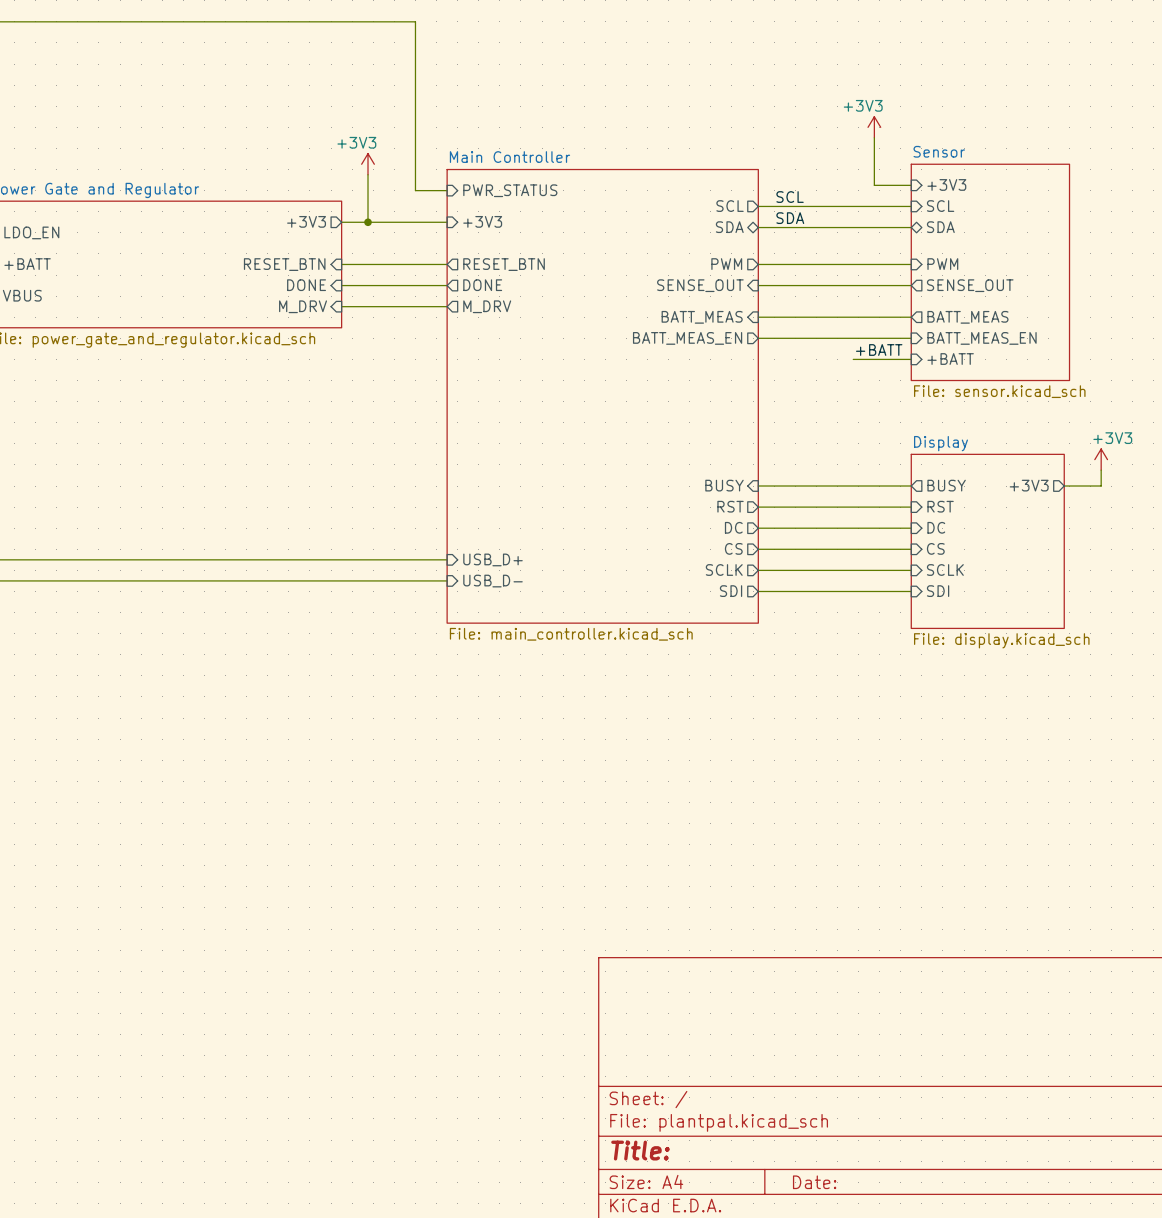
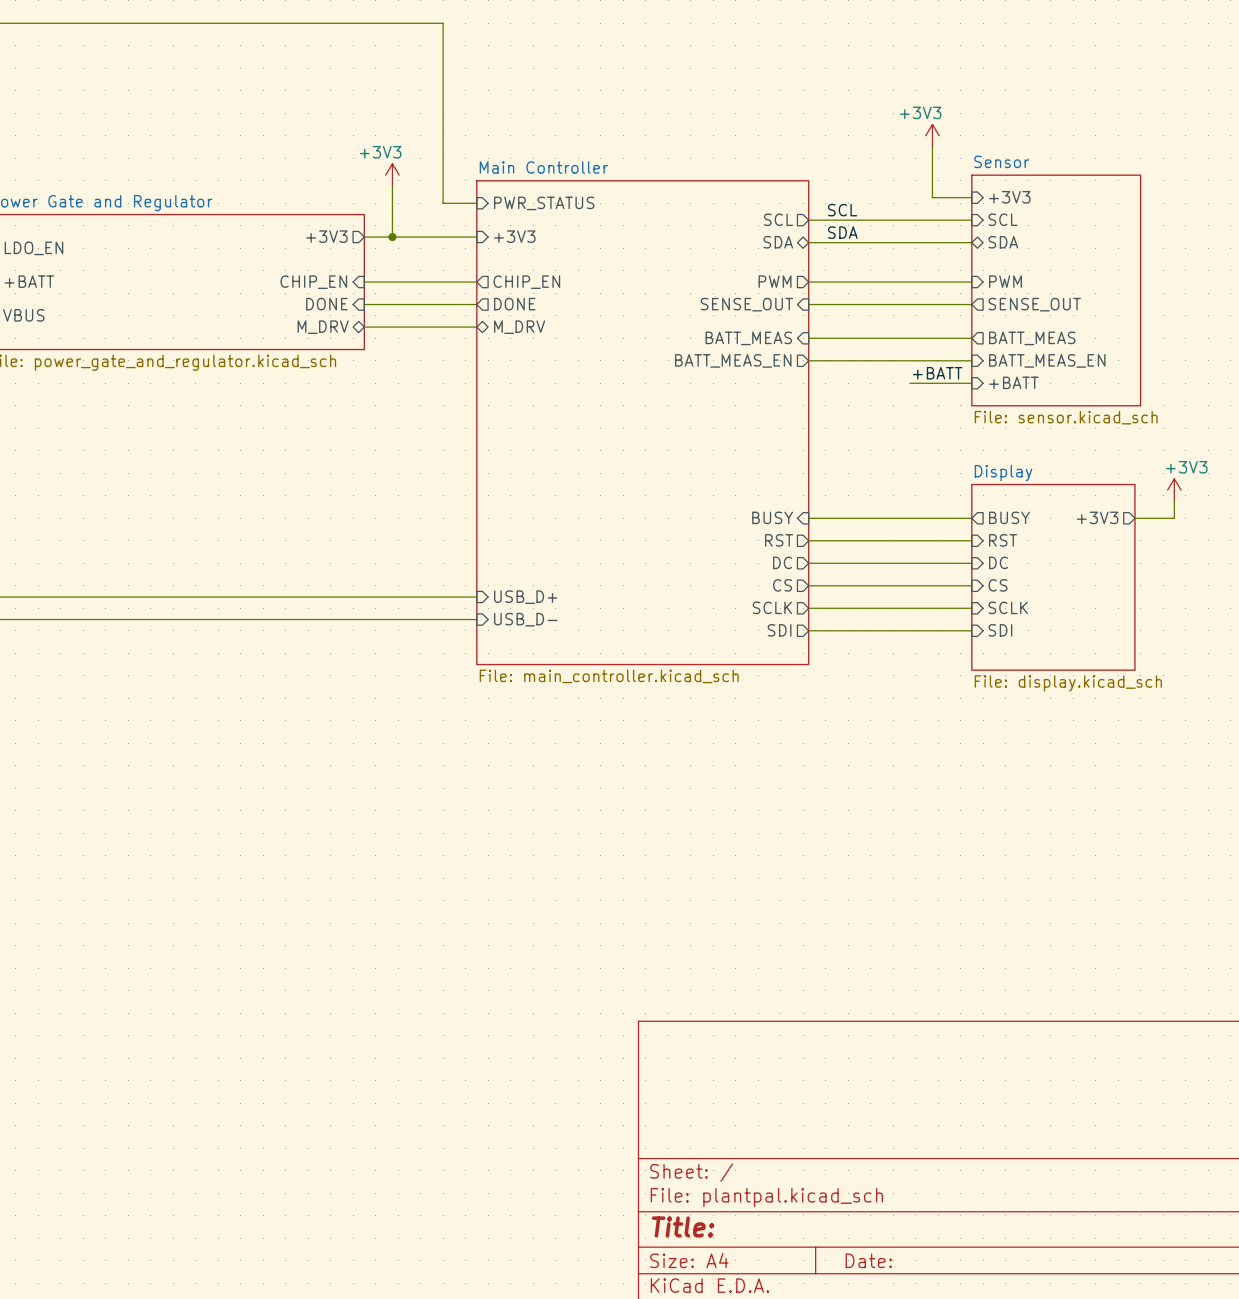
sheet pin: RESET_BTN (284, 264) -> CHIP_EN (313, 282)
sheet pin: RESET_BTN (504, 264) -> CHIP_EN (526, 282)
sheet pin shape: input (303, 306) -> bidirectional (323, 327)
sheet pin shape: output (487, 306) -> bidirectional (519, 327)

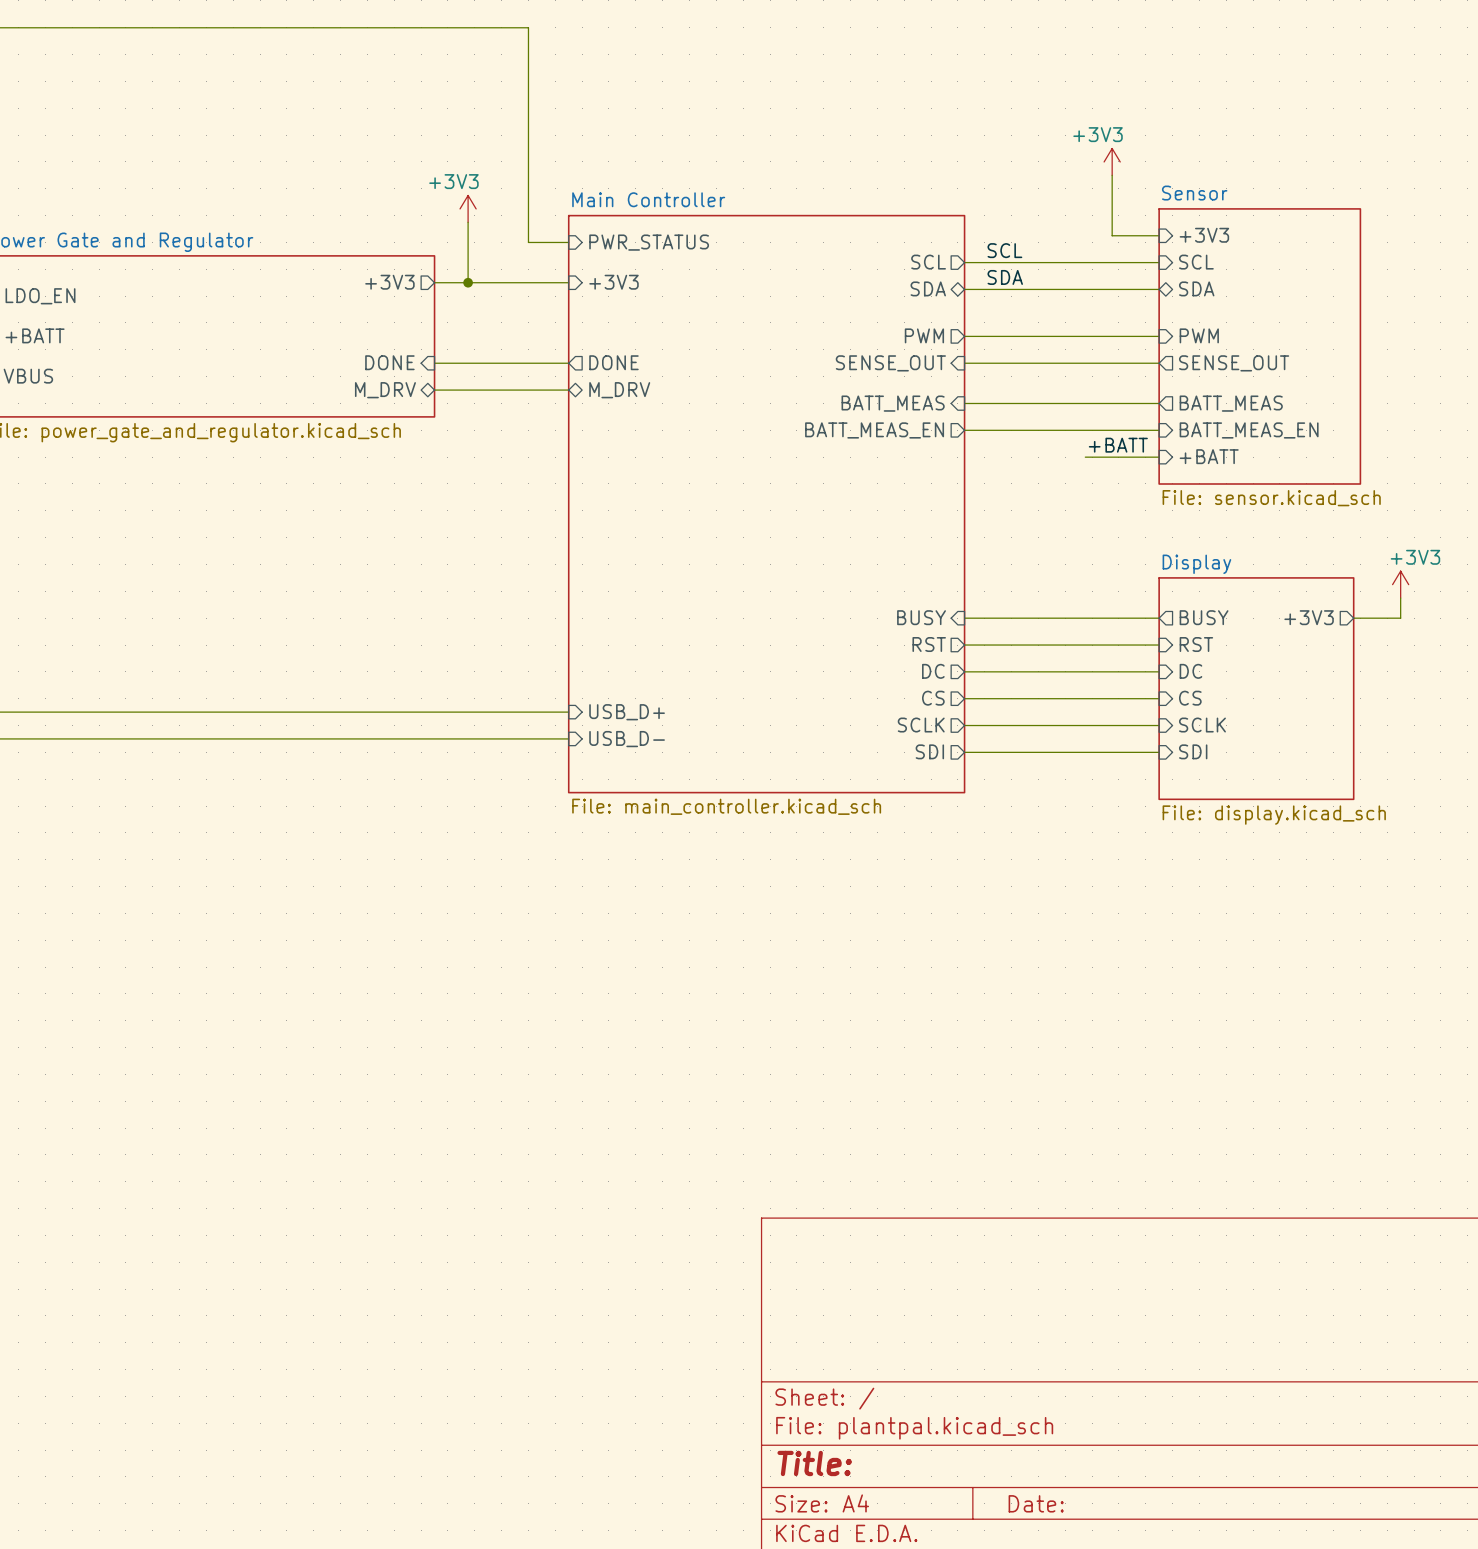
sheet pin: CHIP_EN (313, 282) -> none
wire: (364, 282) (476, 282) -> none
sheet pin: CHIP_EN (526, 282) -> none

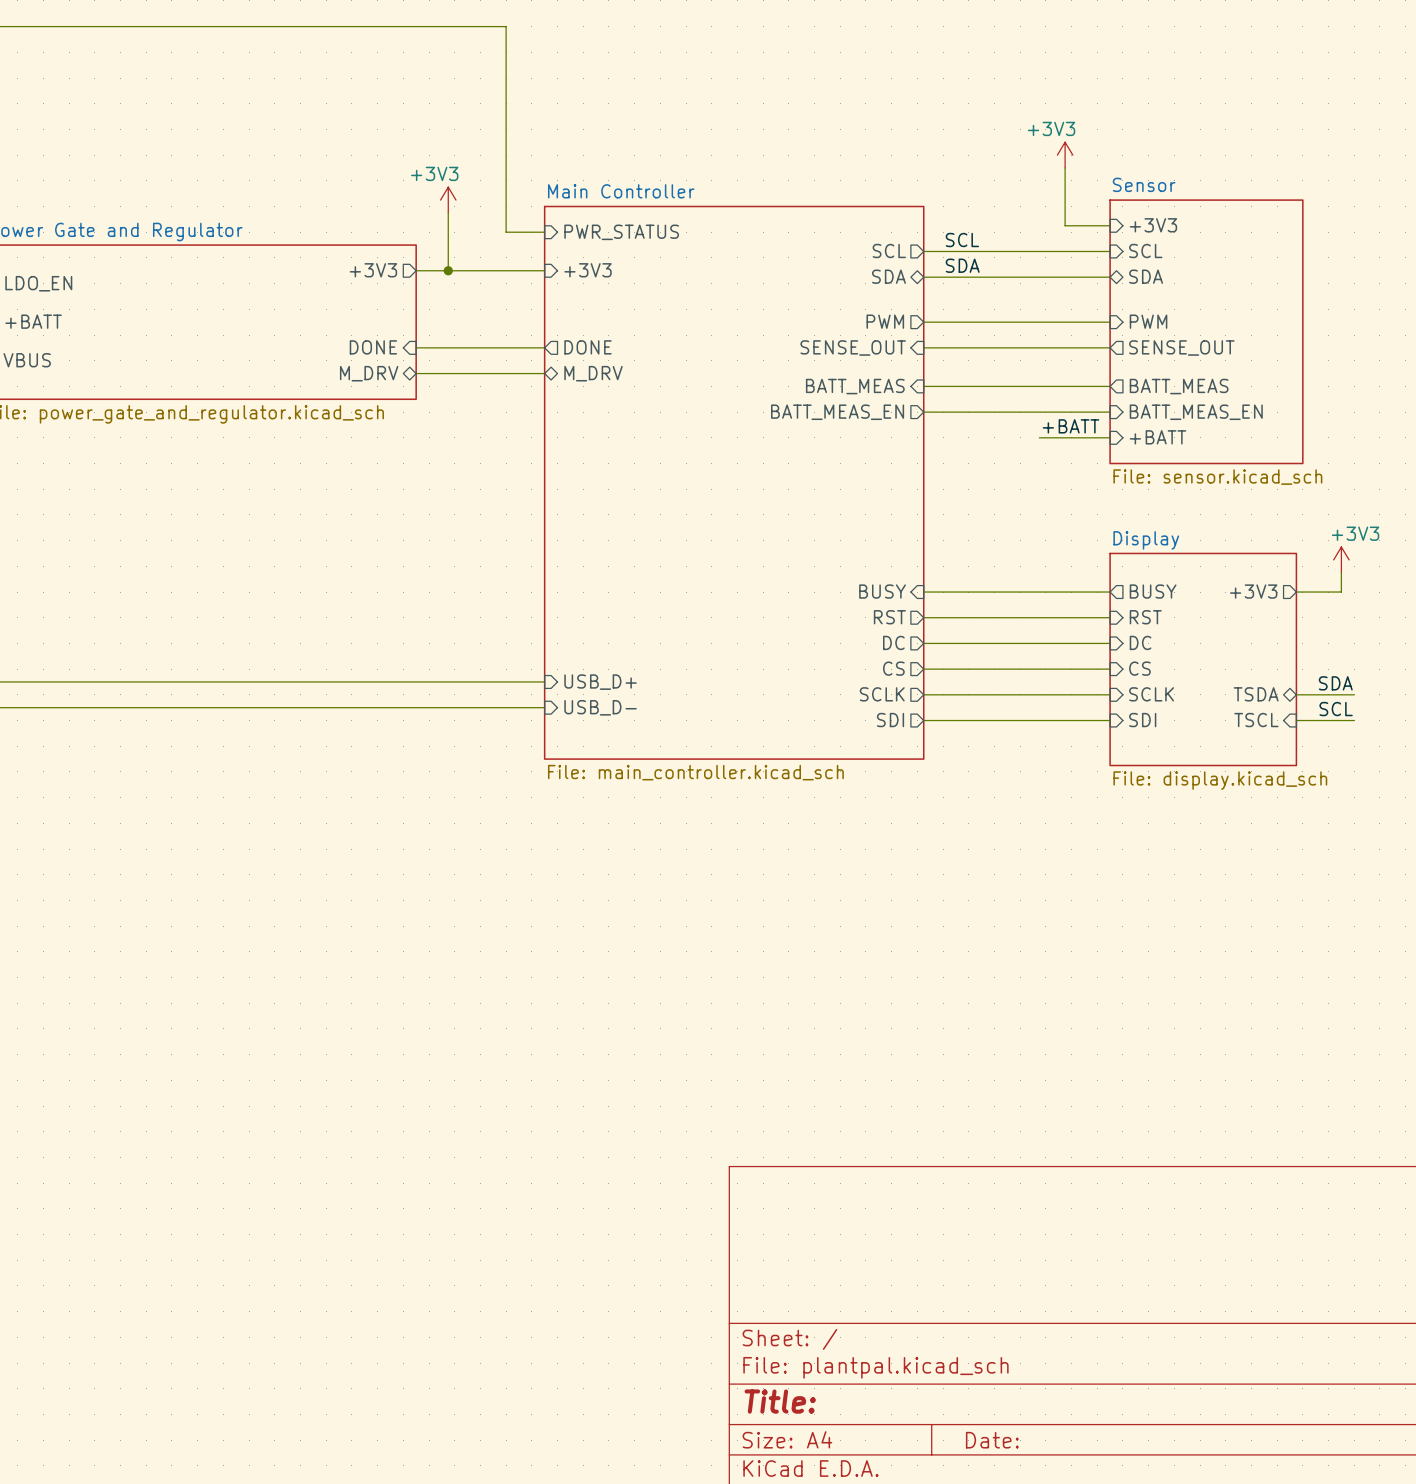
label: none -> SDA (1335, 683)
sheet pin: none -> TSDA (1256, 694)
wire: none -> (1296, 694) (1354, 694)
label: none -> SCL (1336, 709)
sheet pin: none -> TSCL (1256, 720)
wire: none -> (1296, 720) (1354, 720)

